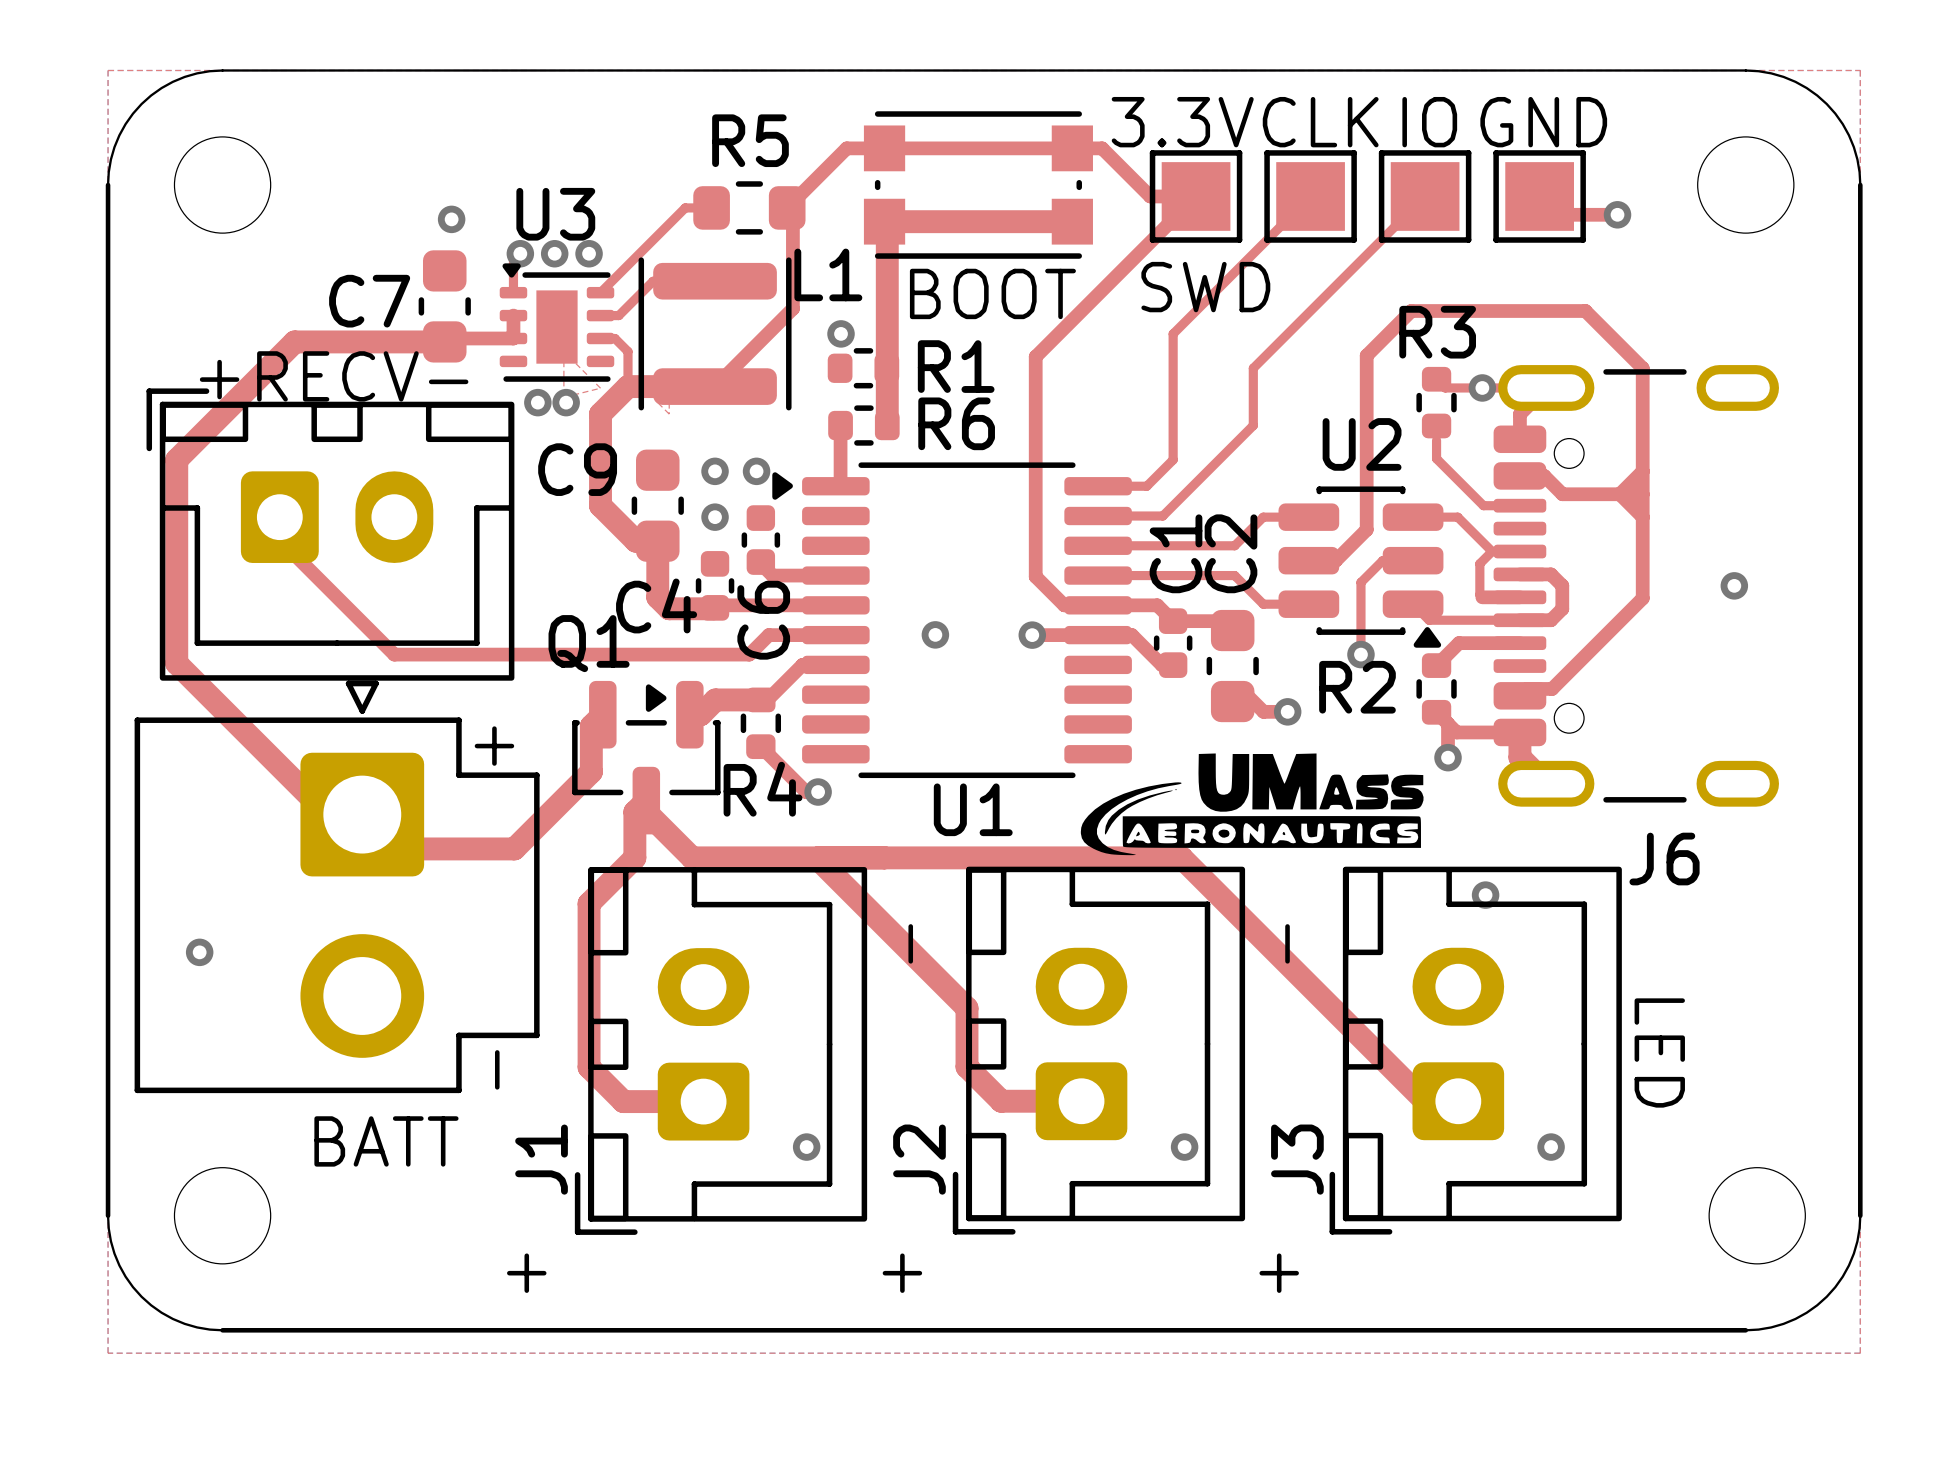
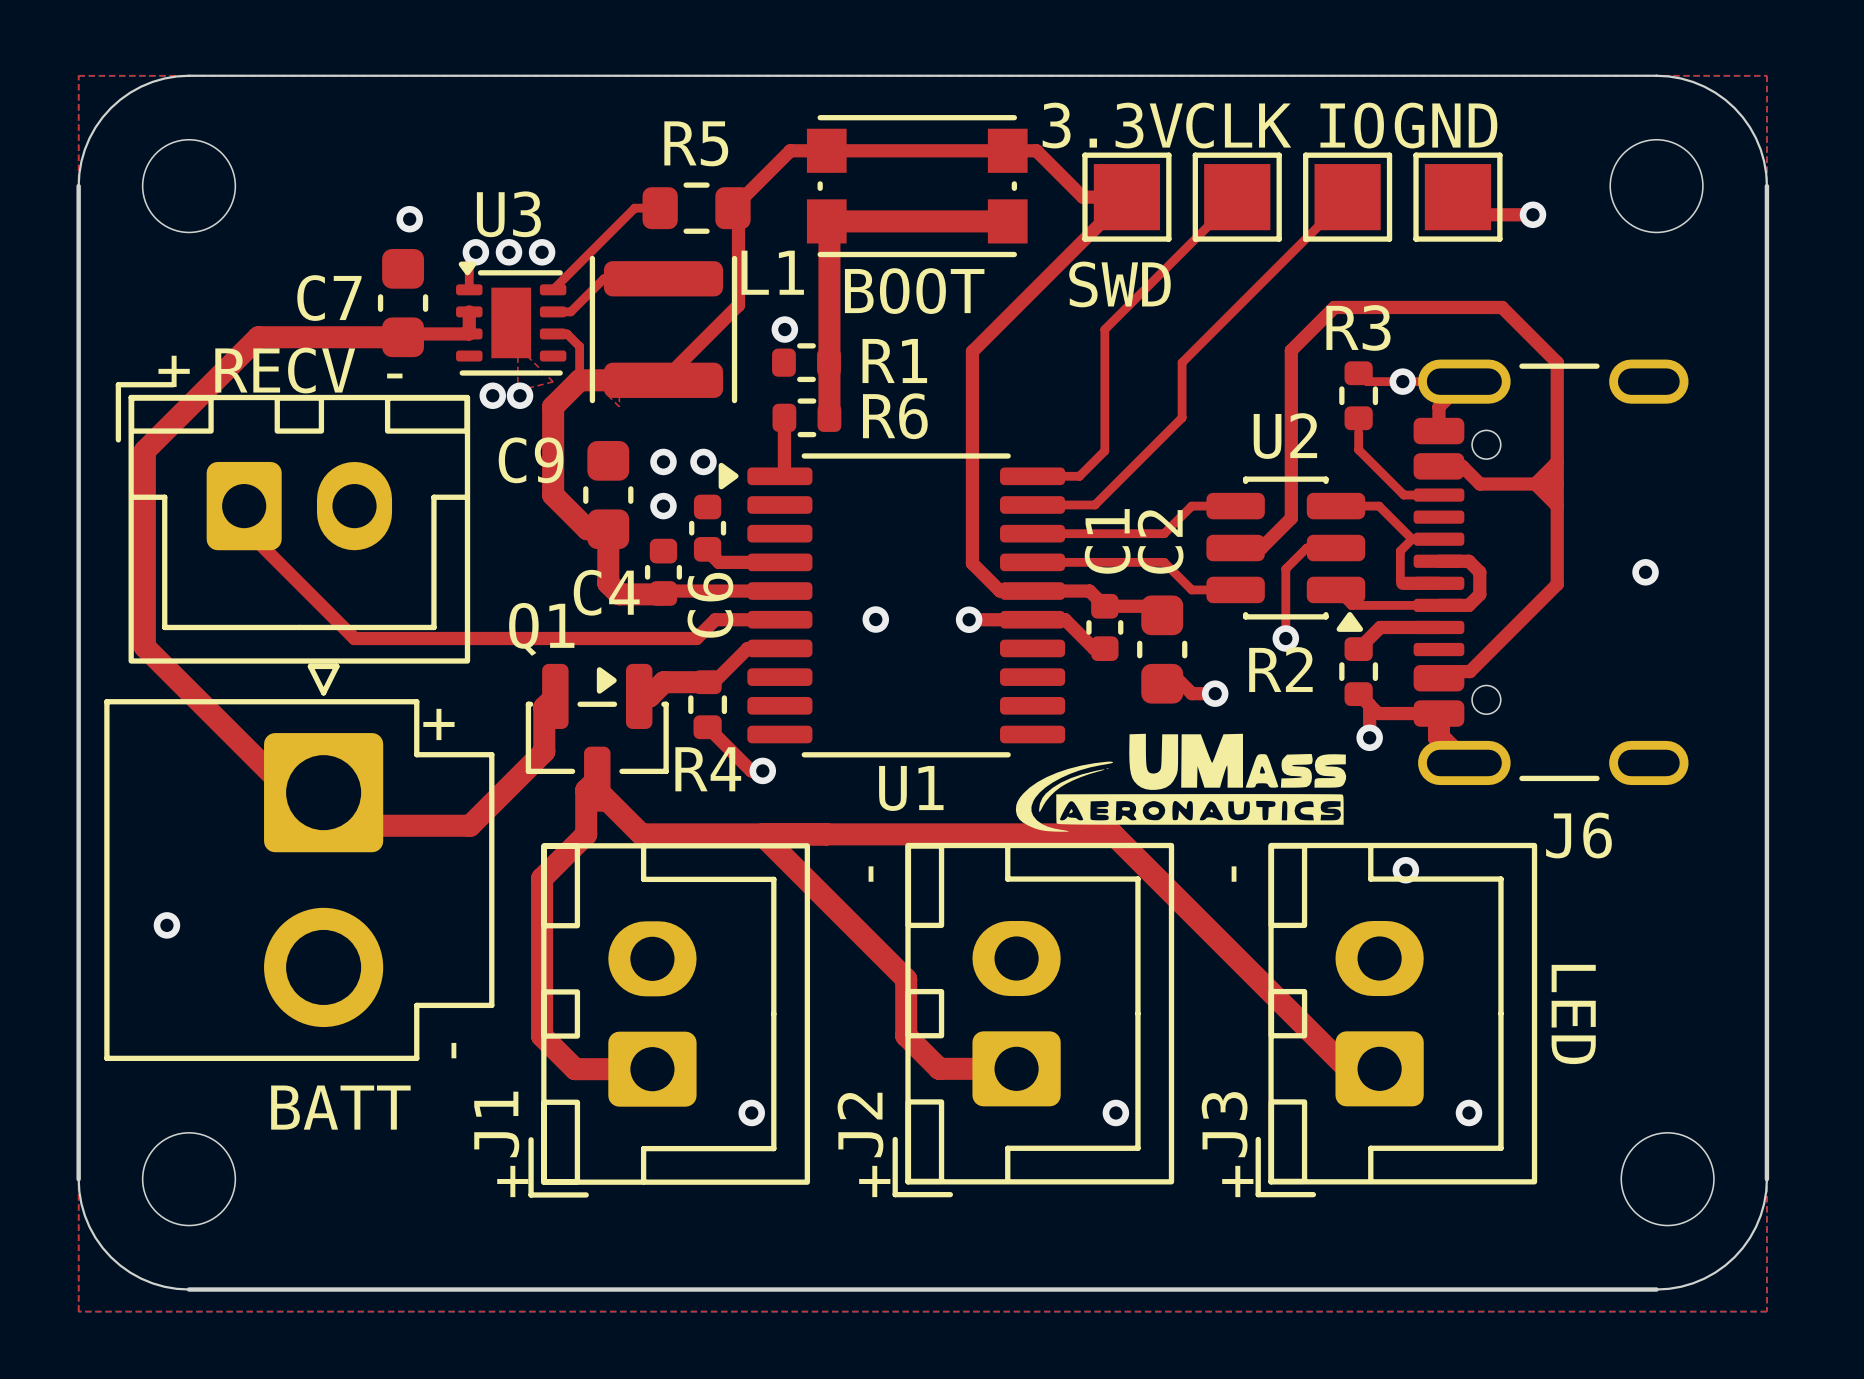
text position: - (910, 943) -> - (871, 874)
text position: - (1287, 943) -> - (1234, 874)
text position: + (526, 1273) -> + (512, 1181)
text position: + (902, 1273) -> + (874, 1181)
text position: + (1279, 1273) -> + (1237, 1181)

